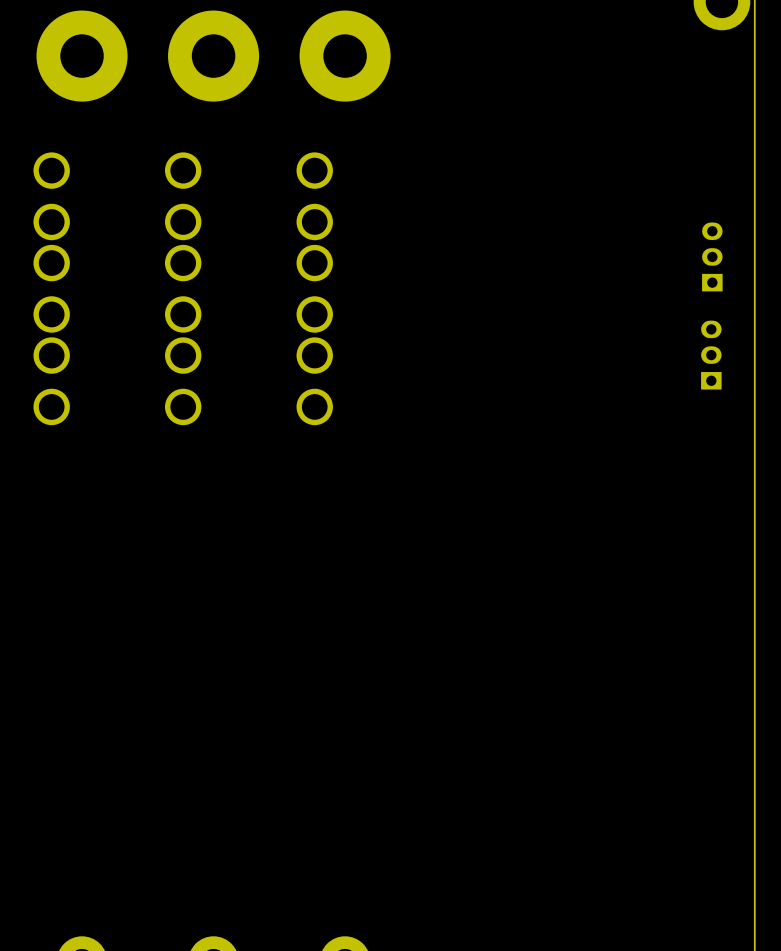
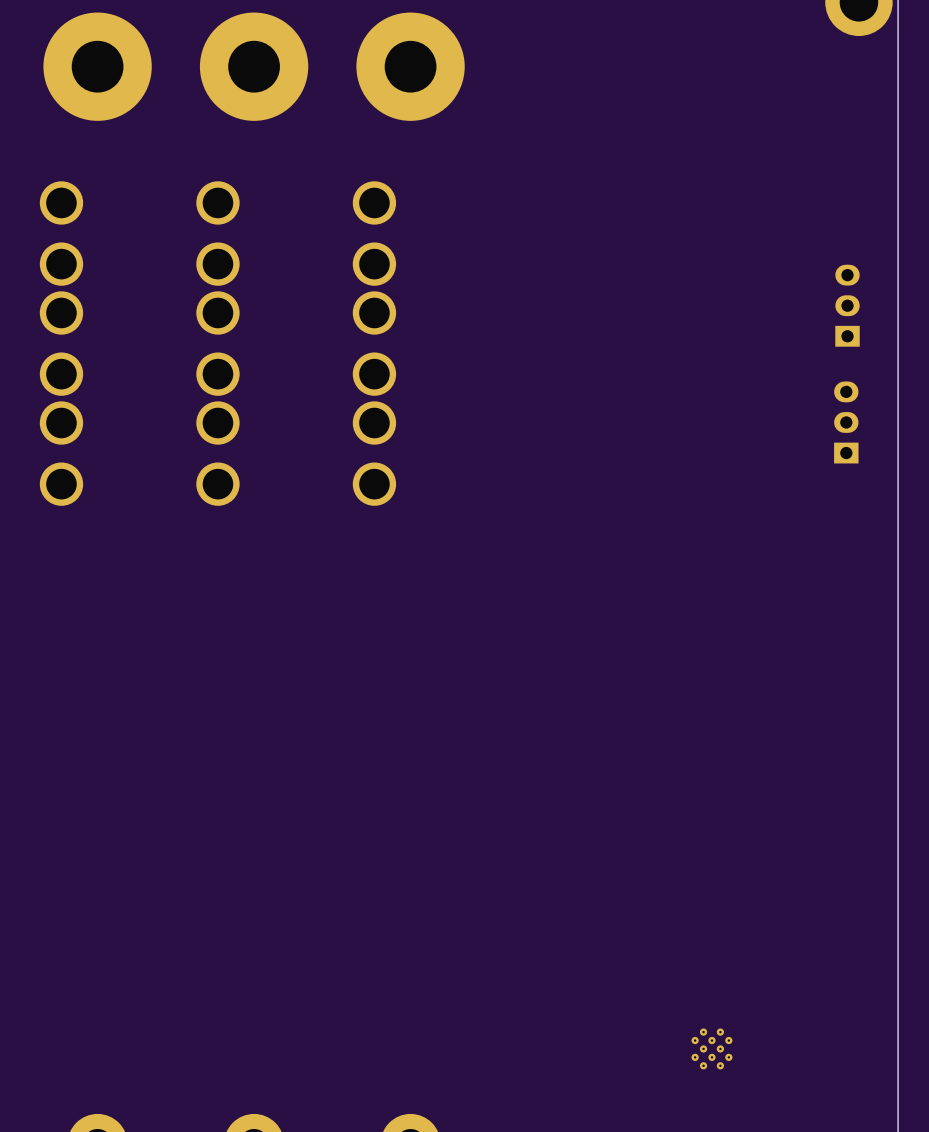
part: none -> (711, 1048)

